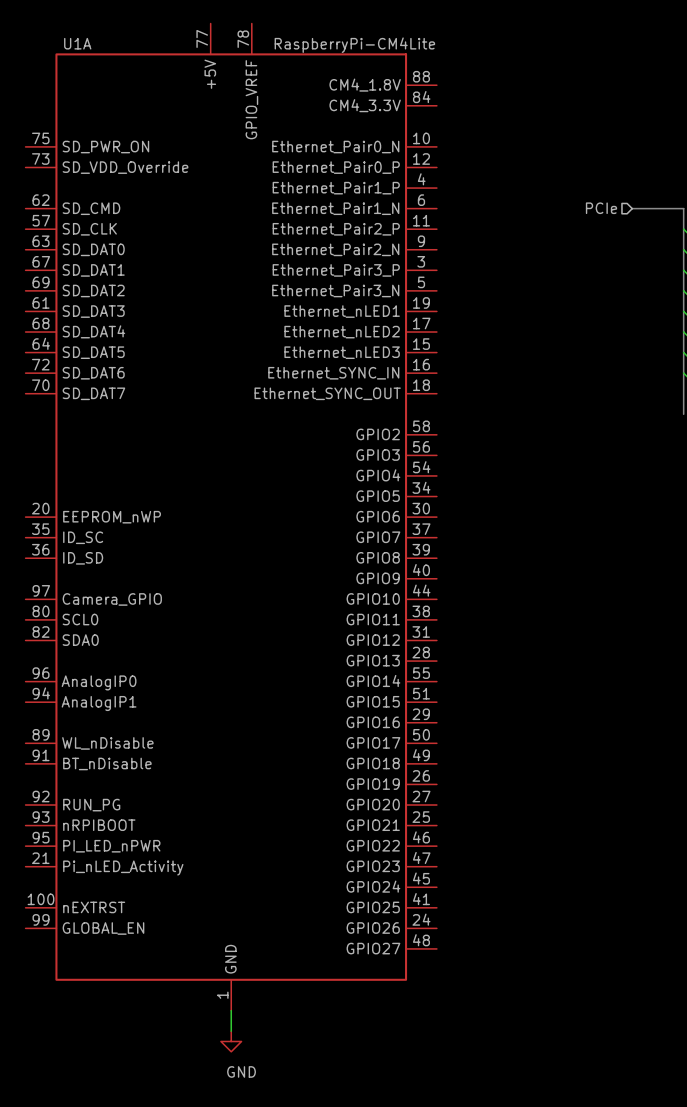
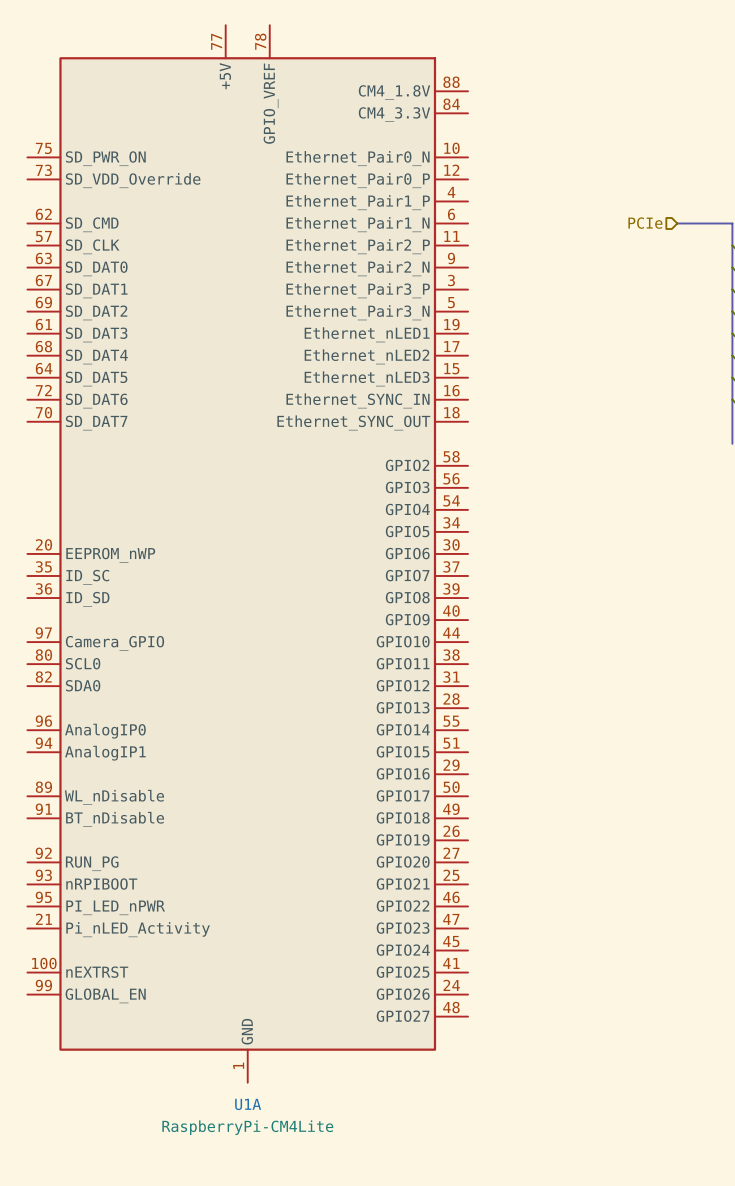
U1A name position: U1A (77, 43) -> U1A (248, 1104)
U1A value position: RaspberryPi-CM4Lite (354, 45) -> RaspberryPi-CM4Lite (247, 1127)
wire: (231, 1010) (231, 1031) -> none
power symbol: GND (231, 1041) -> none

